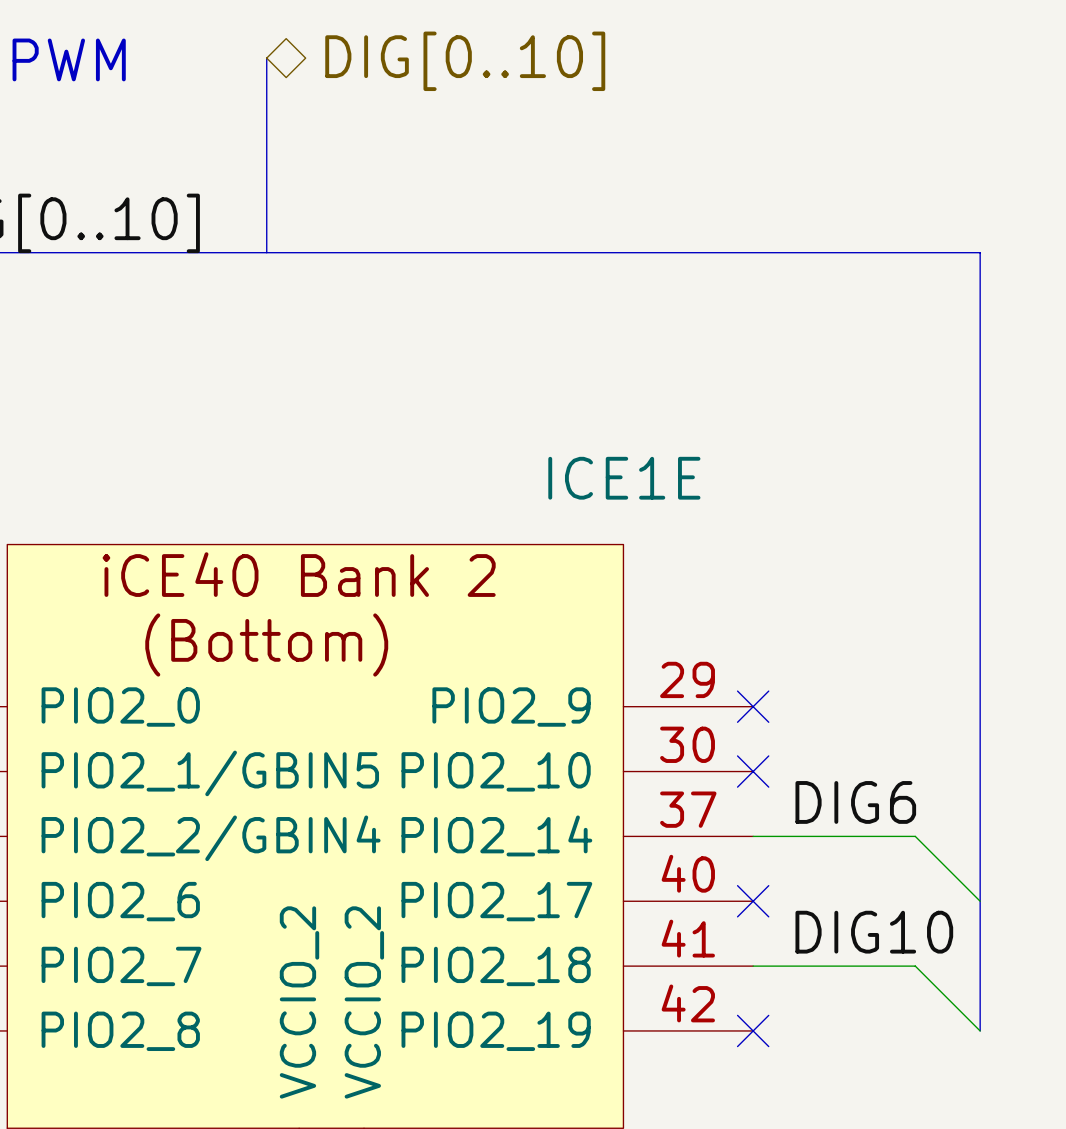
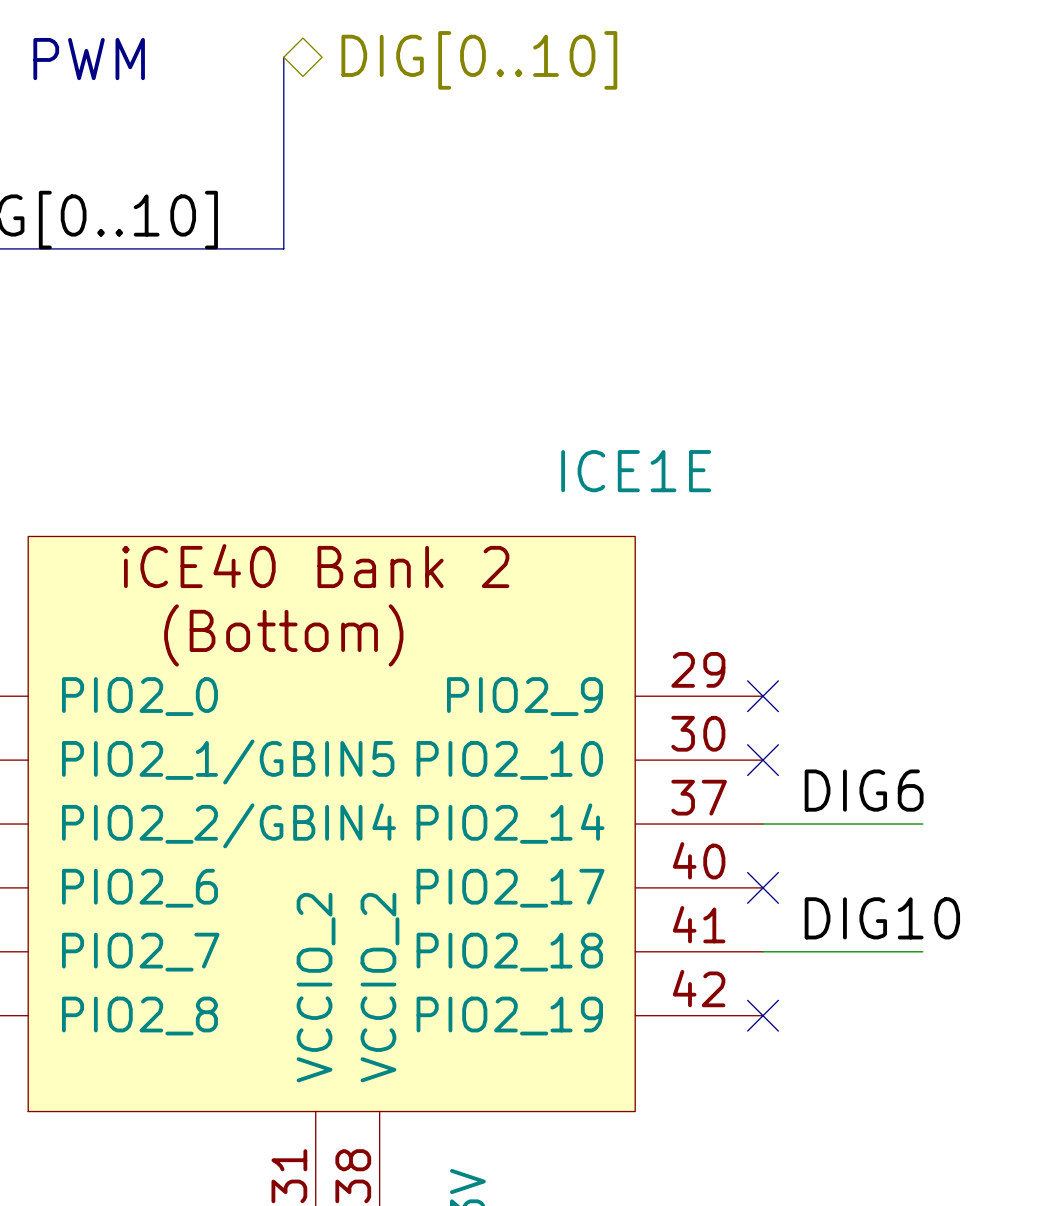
bus: (266, 252) (980, 252) (980, 1030) -> none
wire: (915, 836) (980, 901) -> none
wire: (915, 966) (980, 1030) -> none

